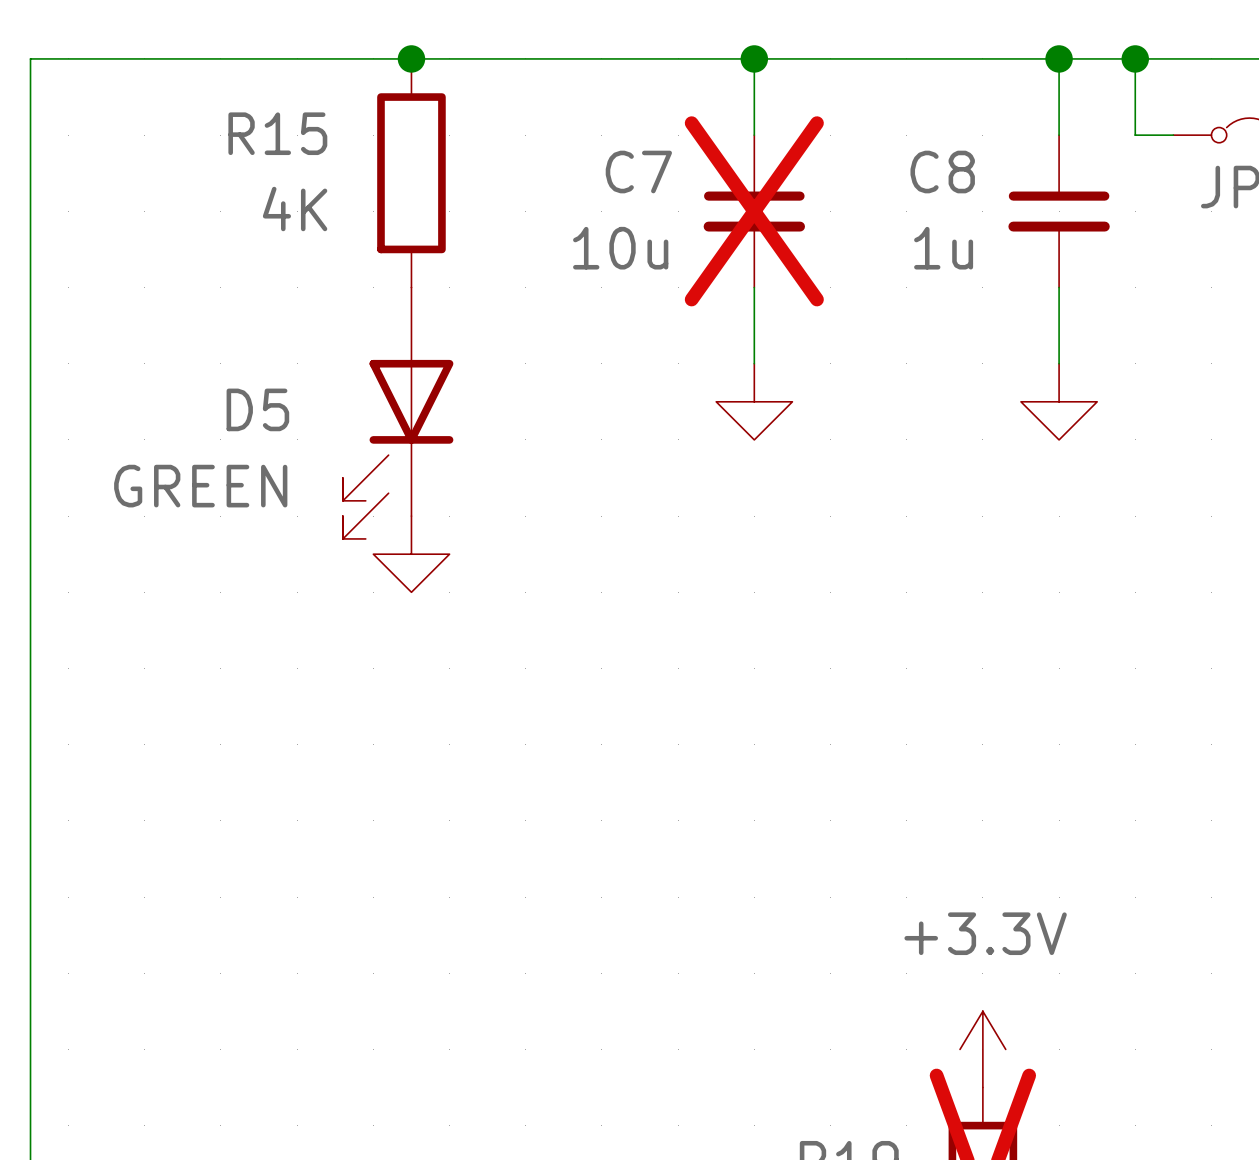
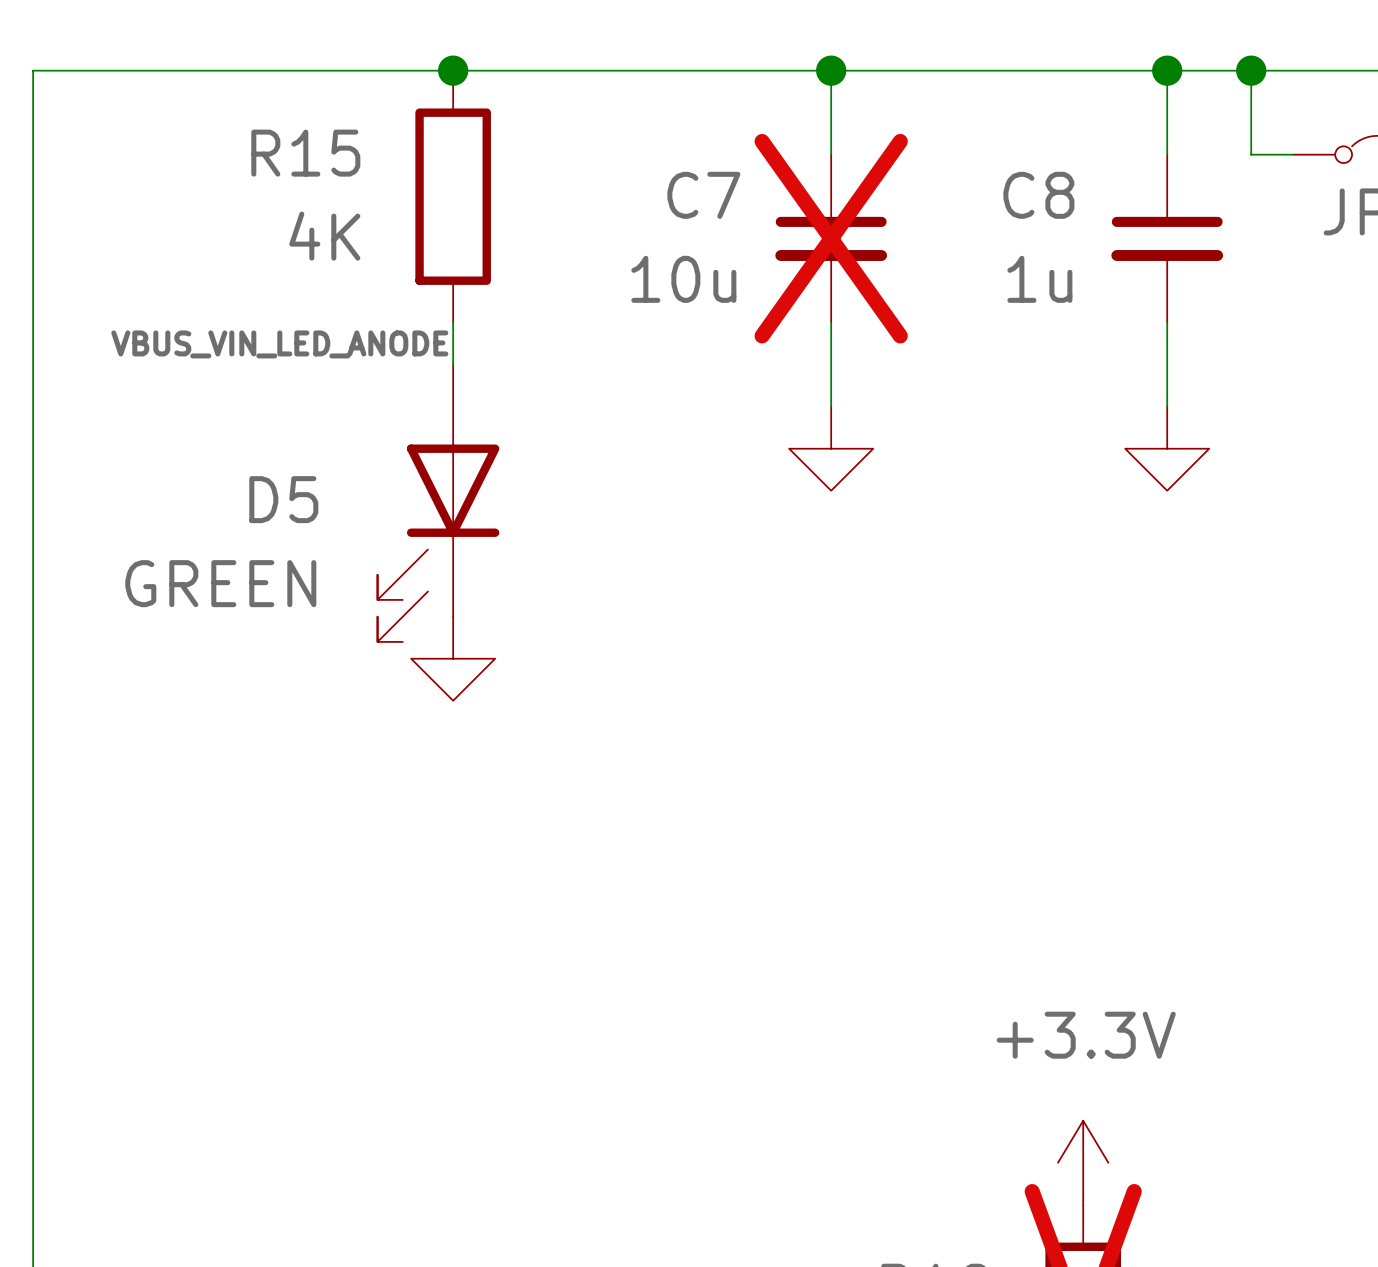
label: none -> VBUS_VIN_LED_ANODE (279, 344)
D5 position: (398, 413) -> (438, 503)
power symbol position: (411, 554) -> (453, 658)

